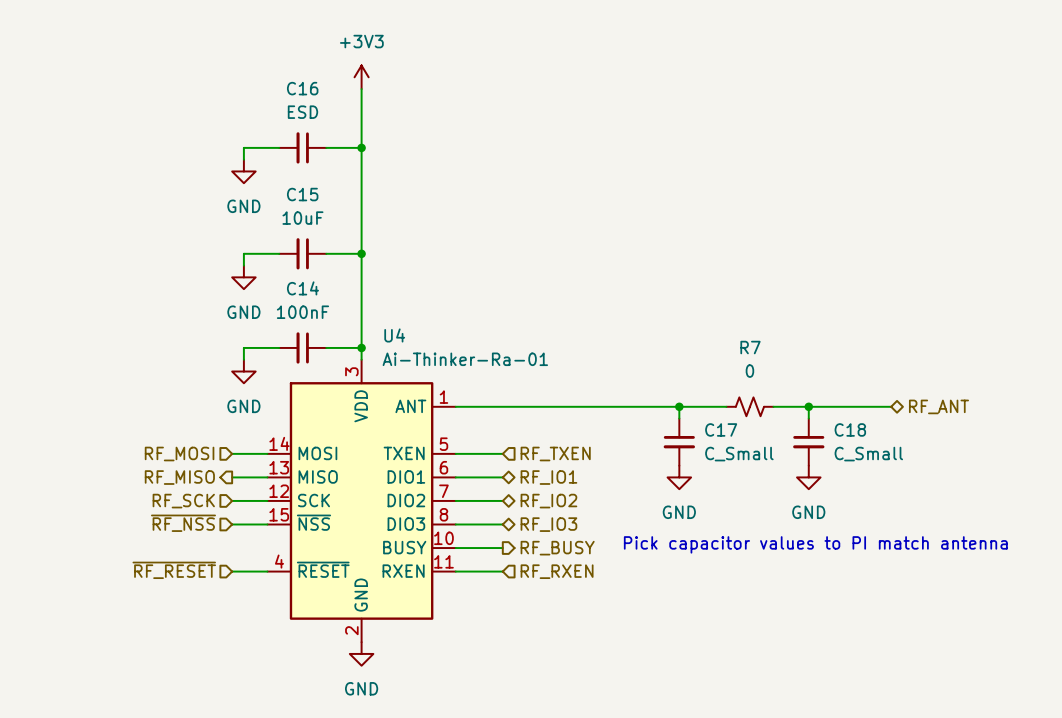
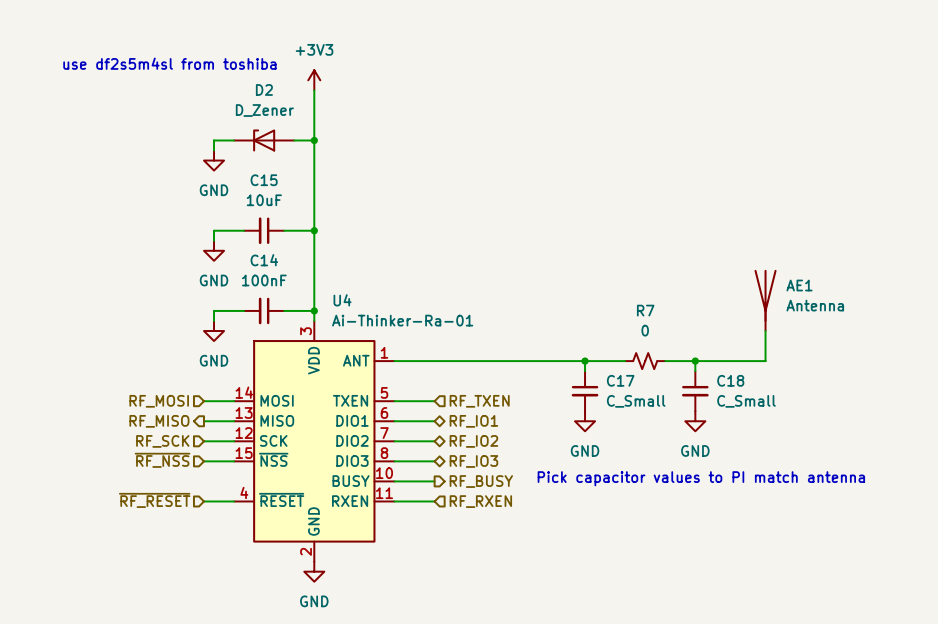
text: none -> use df2s5m4sl from toshiba (169, 63)
C16: ESD (302, 147) -> none
D2: none -> D_Zener (264, 140)
AE1: none -> Antenna (765, 300)
wire: none -> (765, 331) (765, 361)
hierarchical label: RF_ANT (938, 406) -> none

